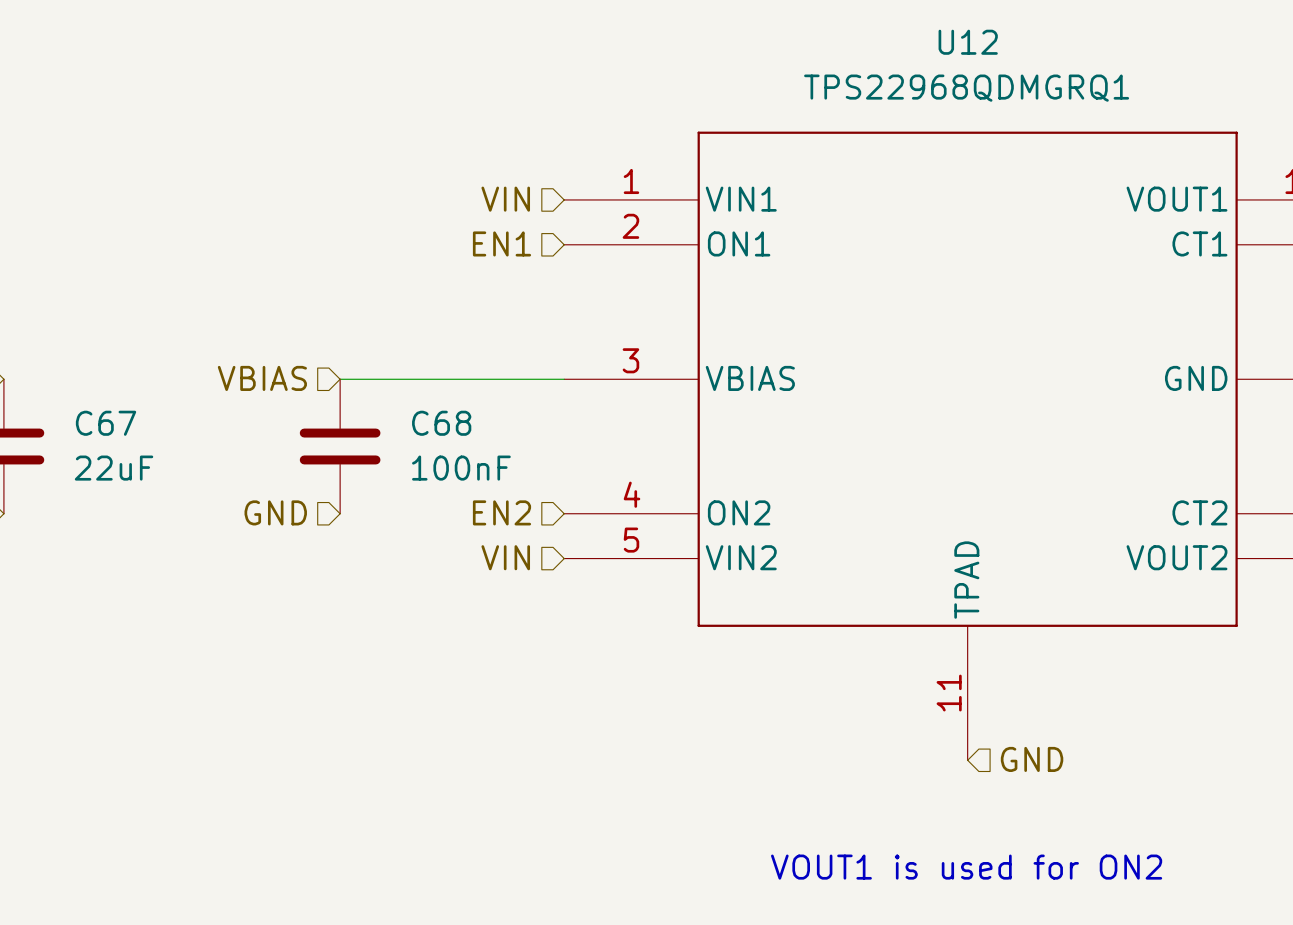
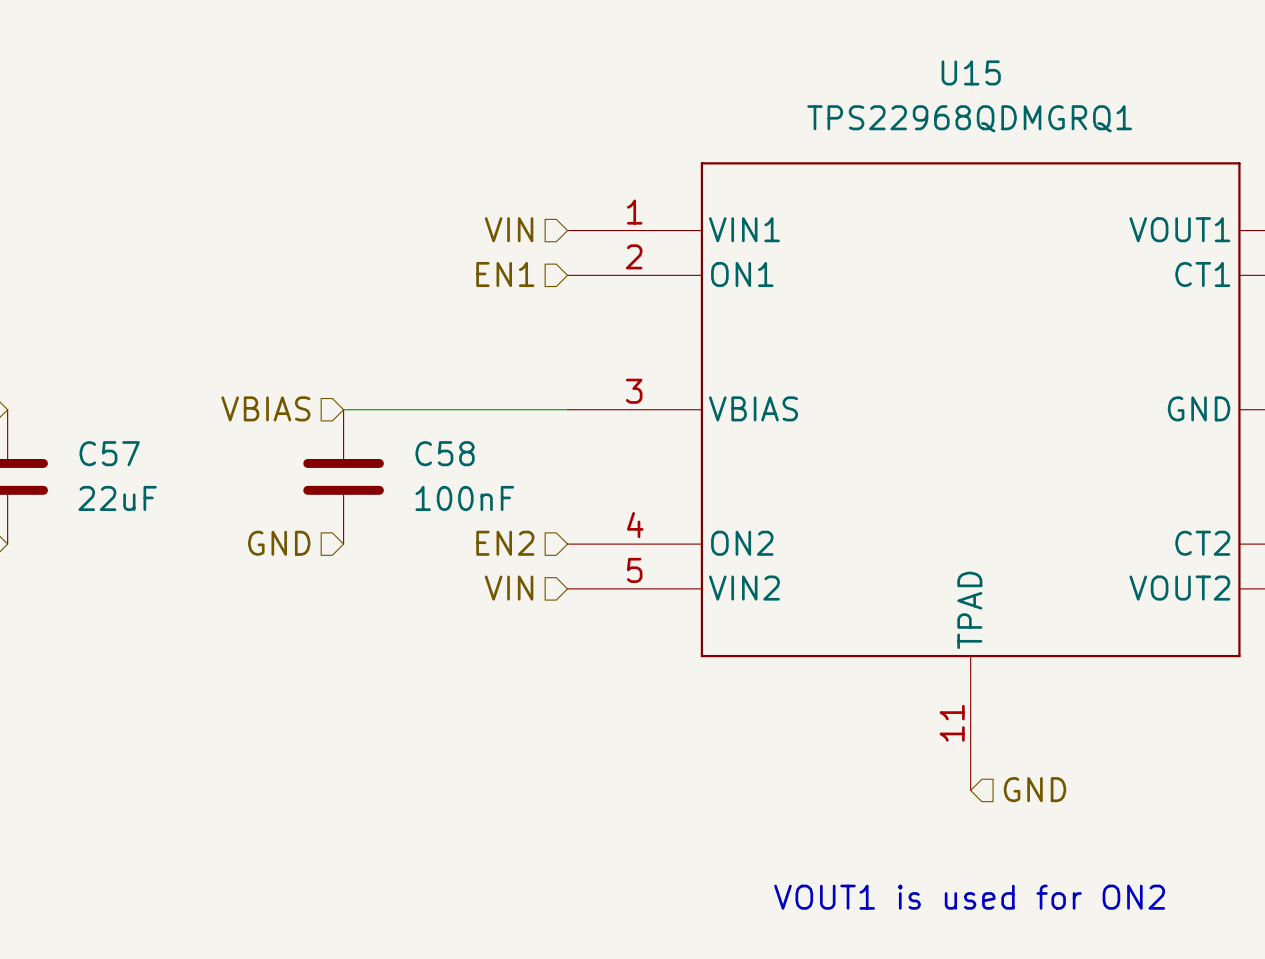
U12 name: U12 (968, 42) -> U15 (971, 72)
C67 name: C67 (106, 423) -> C57 (109, 453)
C68 name: C68 (441, 423) -> C58 (445, 453)

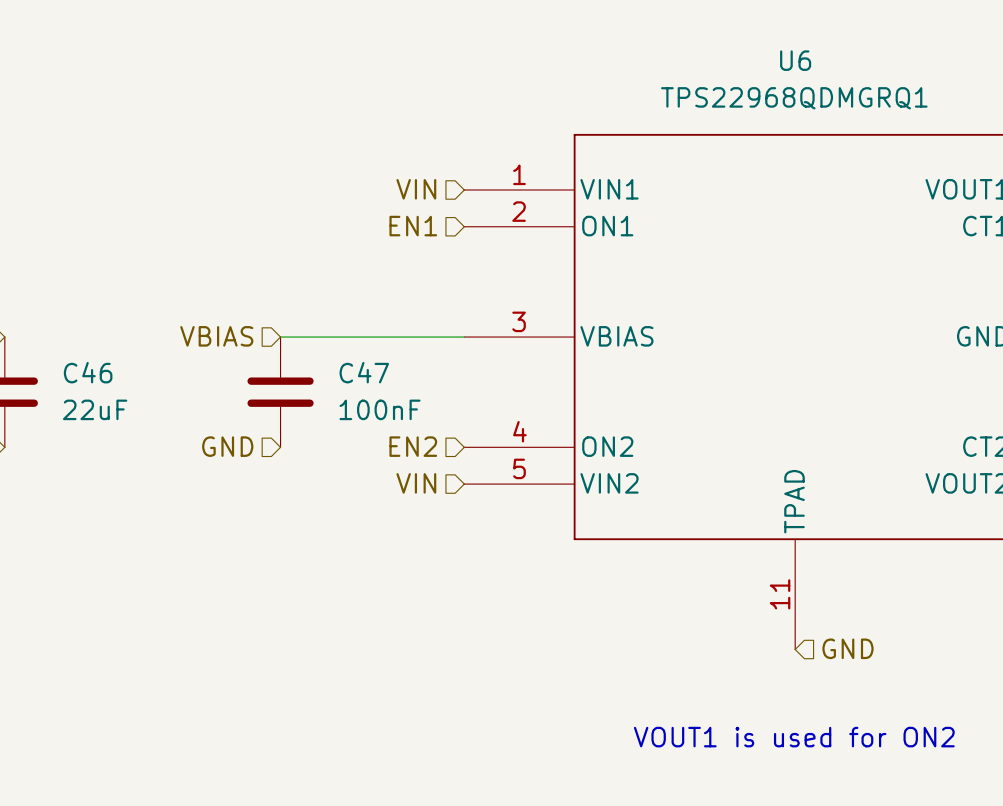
U15 name: U15 (971, 72) -> U6 (795, 60)
C57 name: C57 (109, 453) -> C46 (88, 372)
C58 name: C58 (445, 453) -> C47 (364, 372)

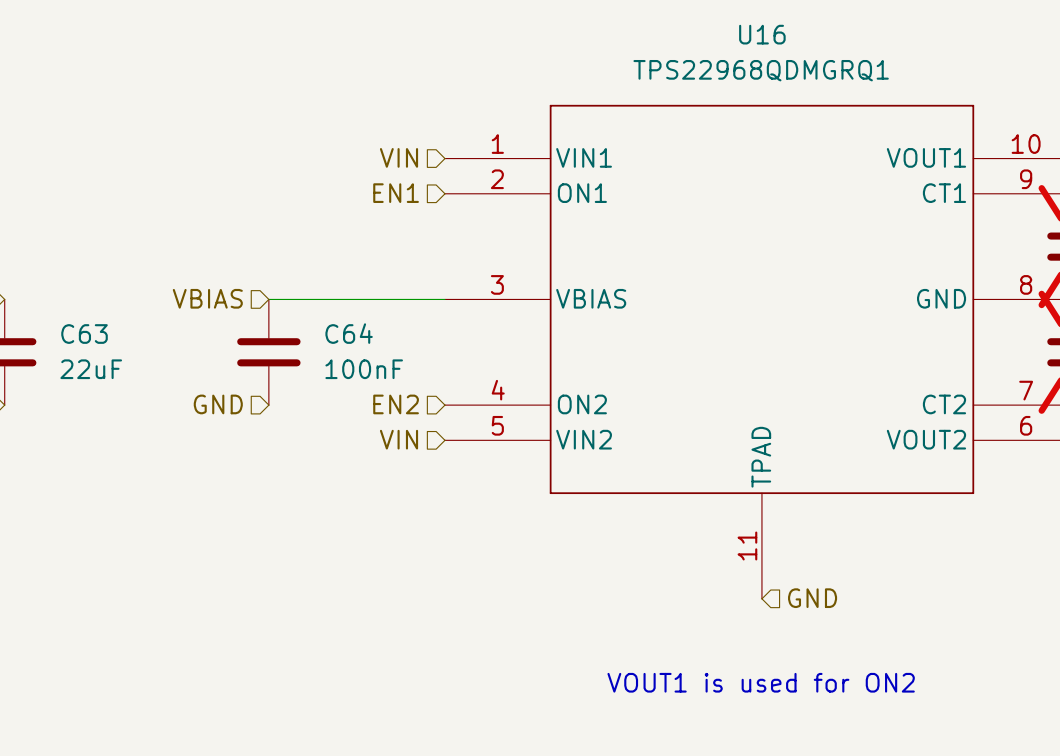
U6 name: U6 (795, 60) -> U16 (762, 34)
C46 name: C46 (88, 372) -> C63 (84, 334)
C47 name: C47 (364, 372) -> C64 (349, 333)

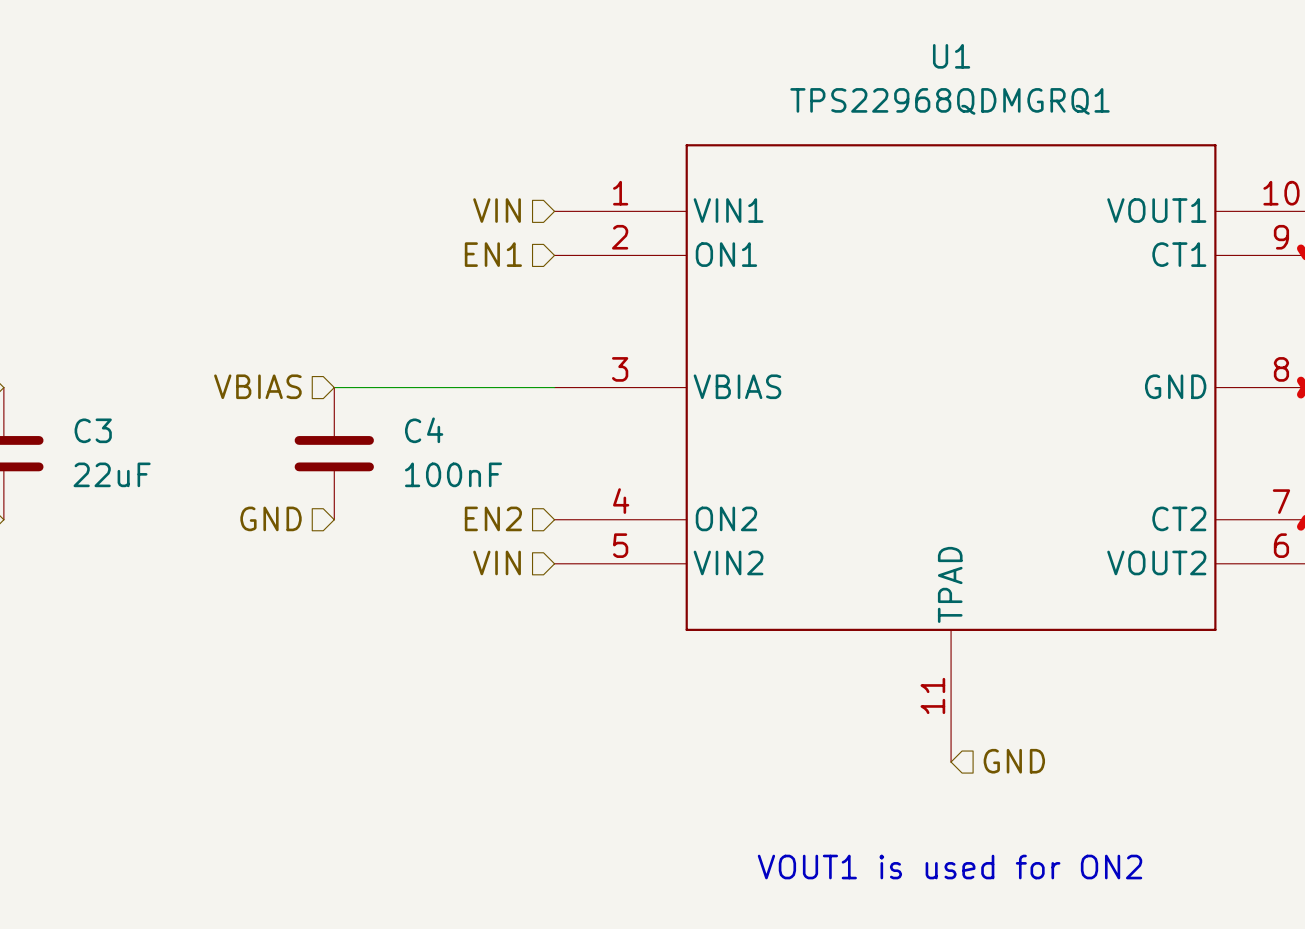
U16 name: U16 (762, 34) -> U1 (951, 56)
C64 name: C64 (349, 333) -> C4 (424, 430)
C63 name: C63 (84, 334) -> C3 (93, 430)

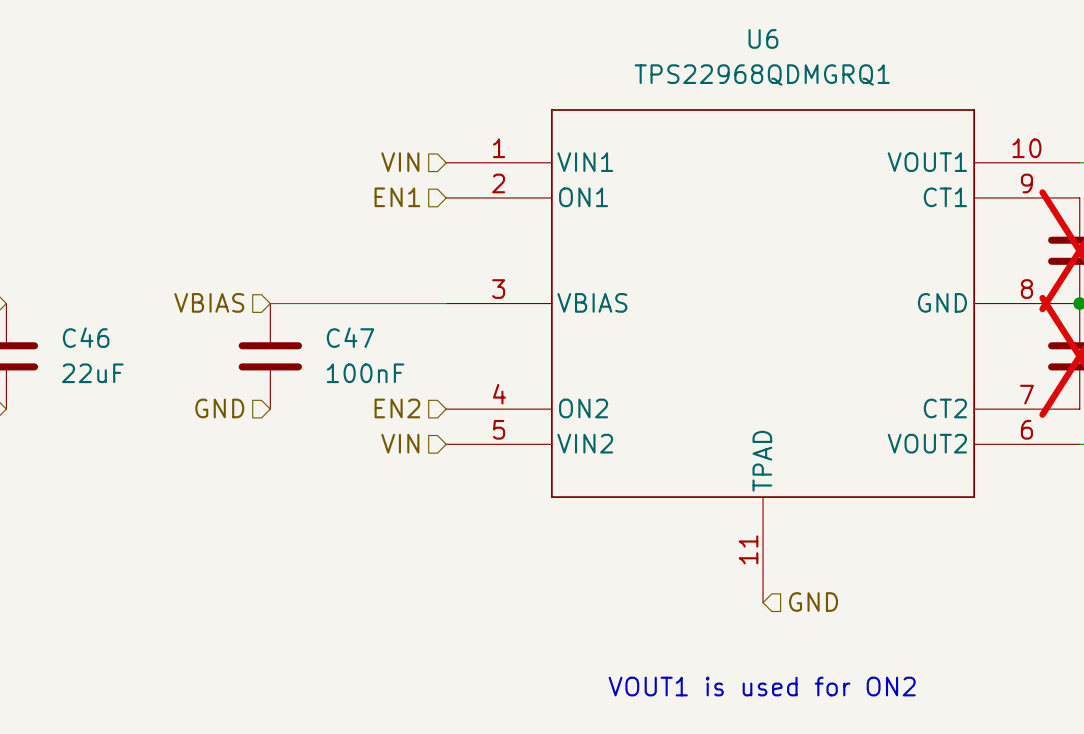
U1 name: U1 (951, 56) -> U6 (763, 38)
C3 name: C3 (93, 430) -> C46 (86, 337)
C4 name: C4 (424, 430) -> C47 (350, 337)

